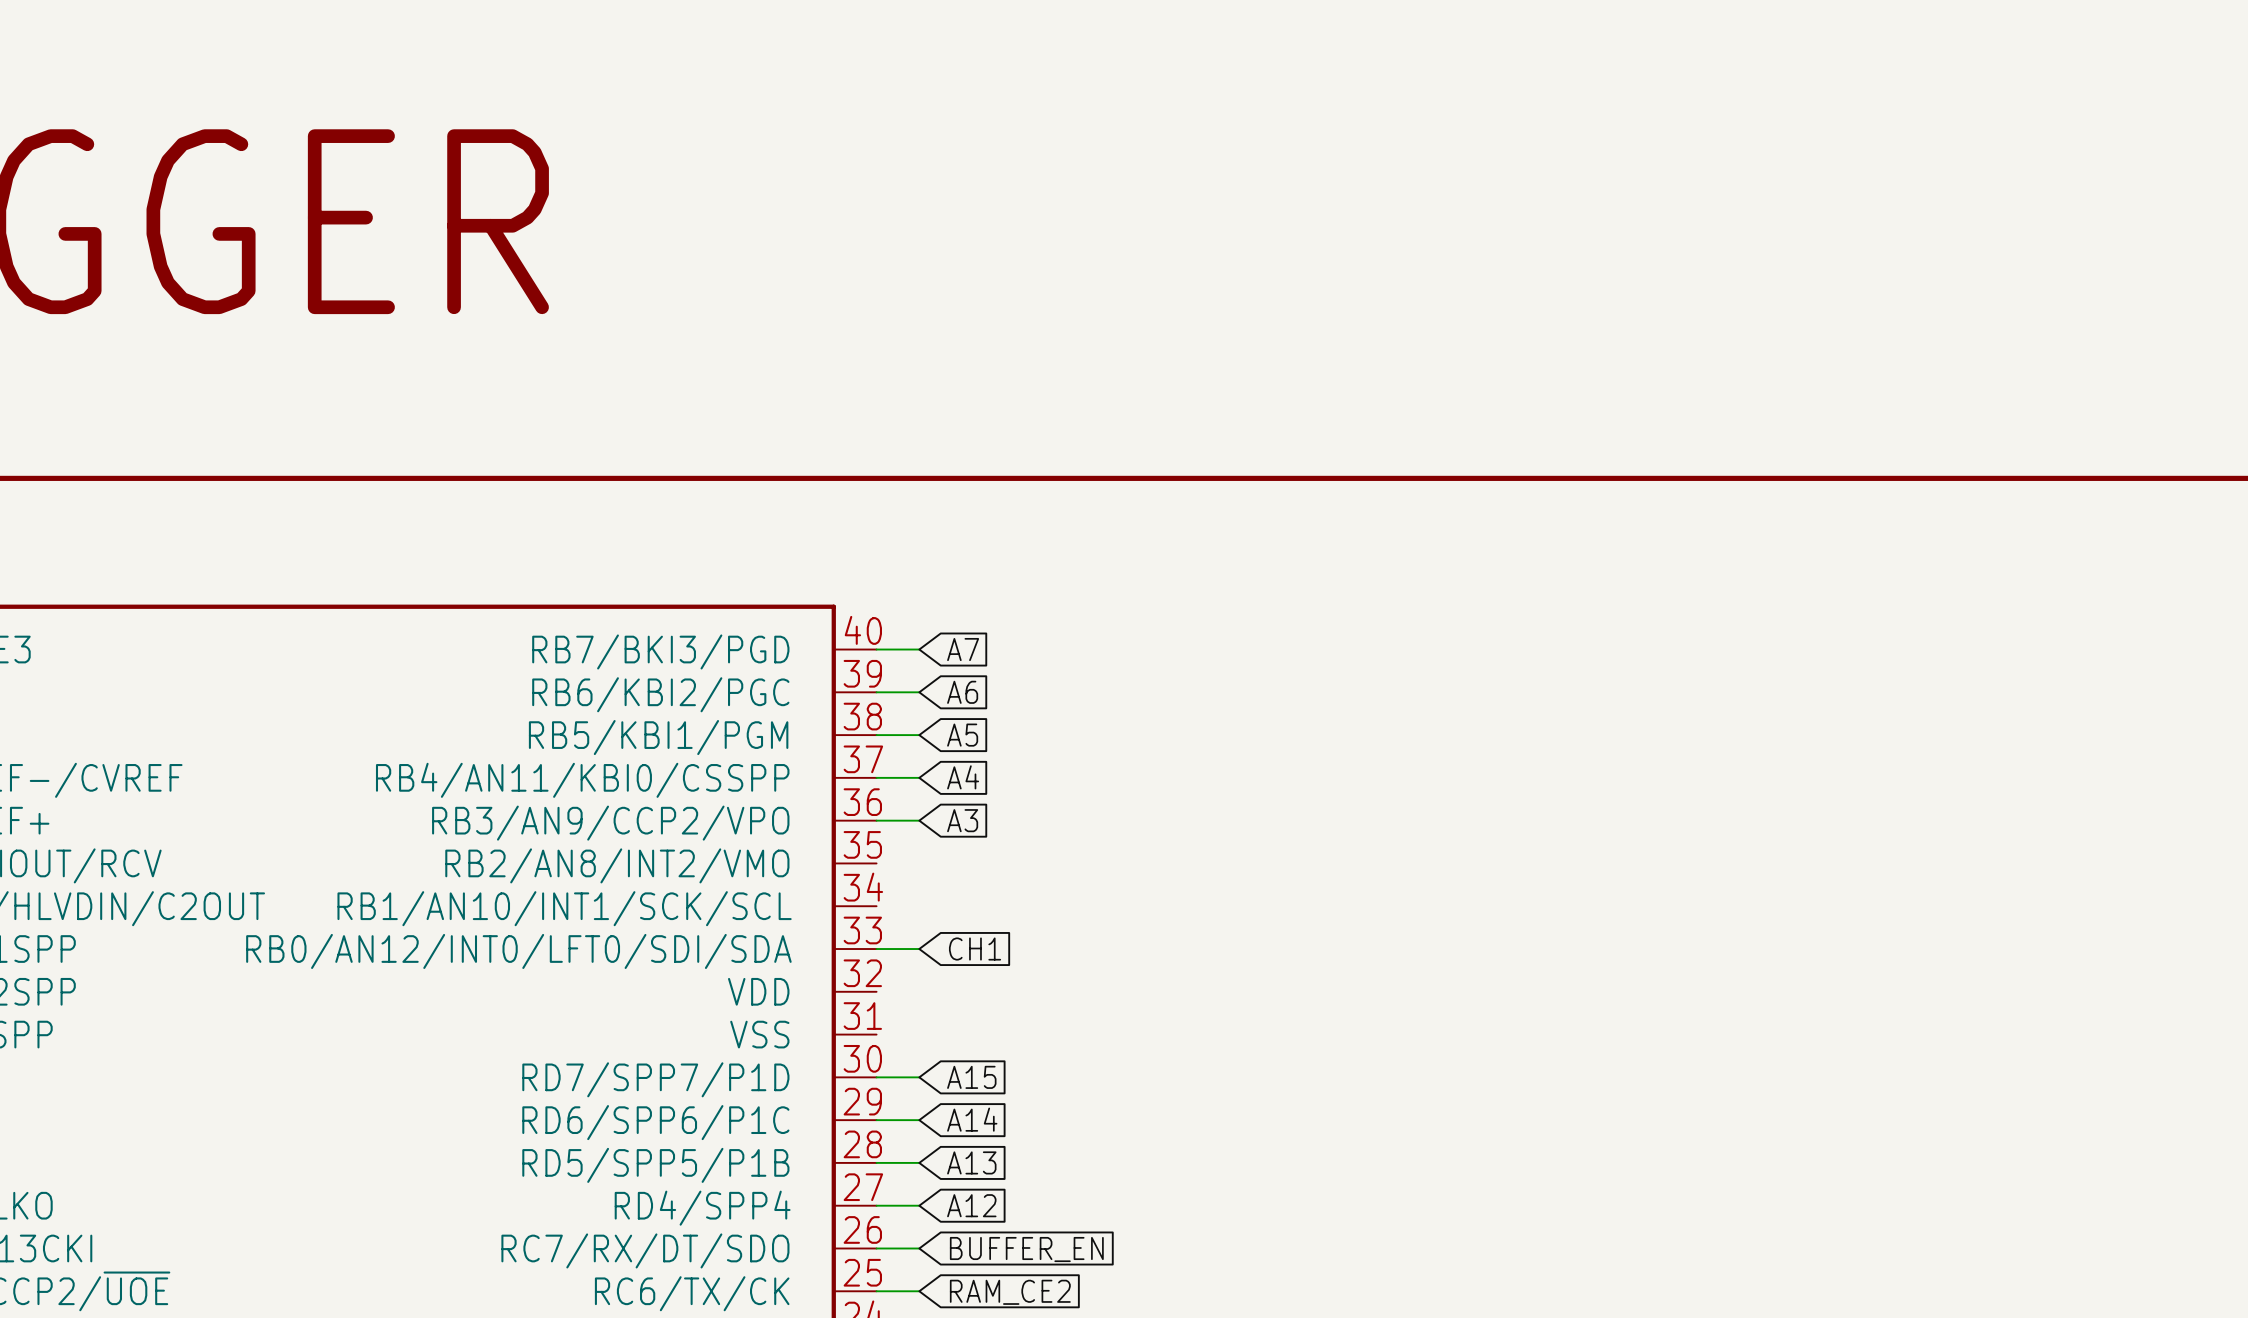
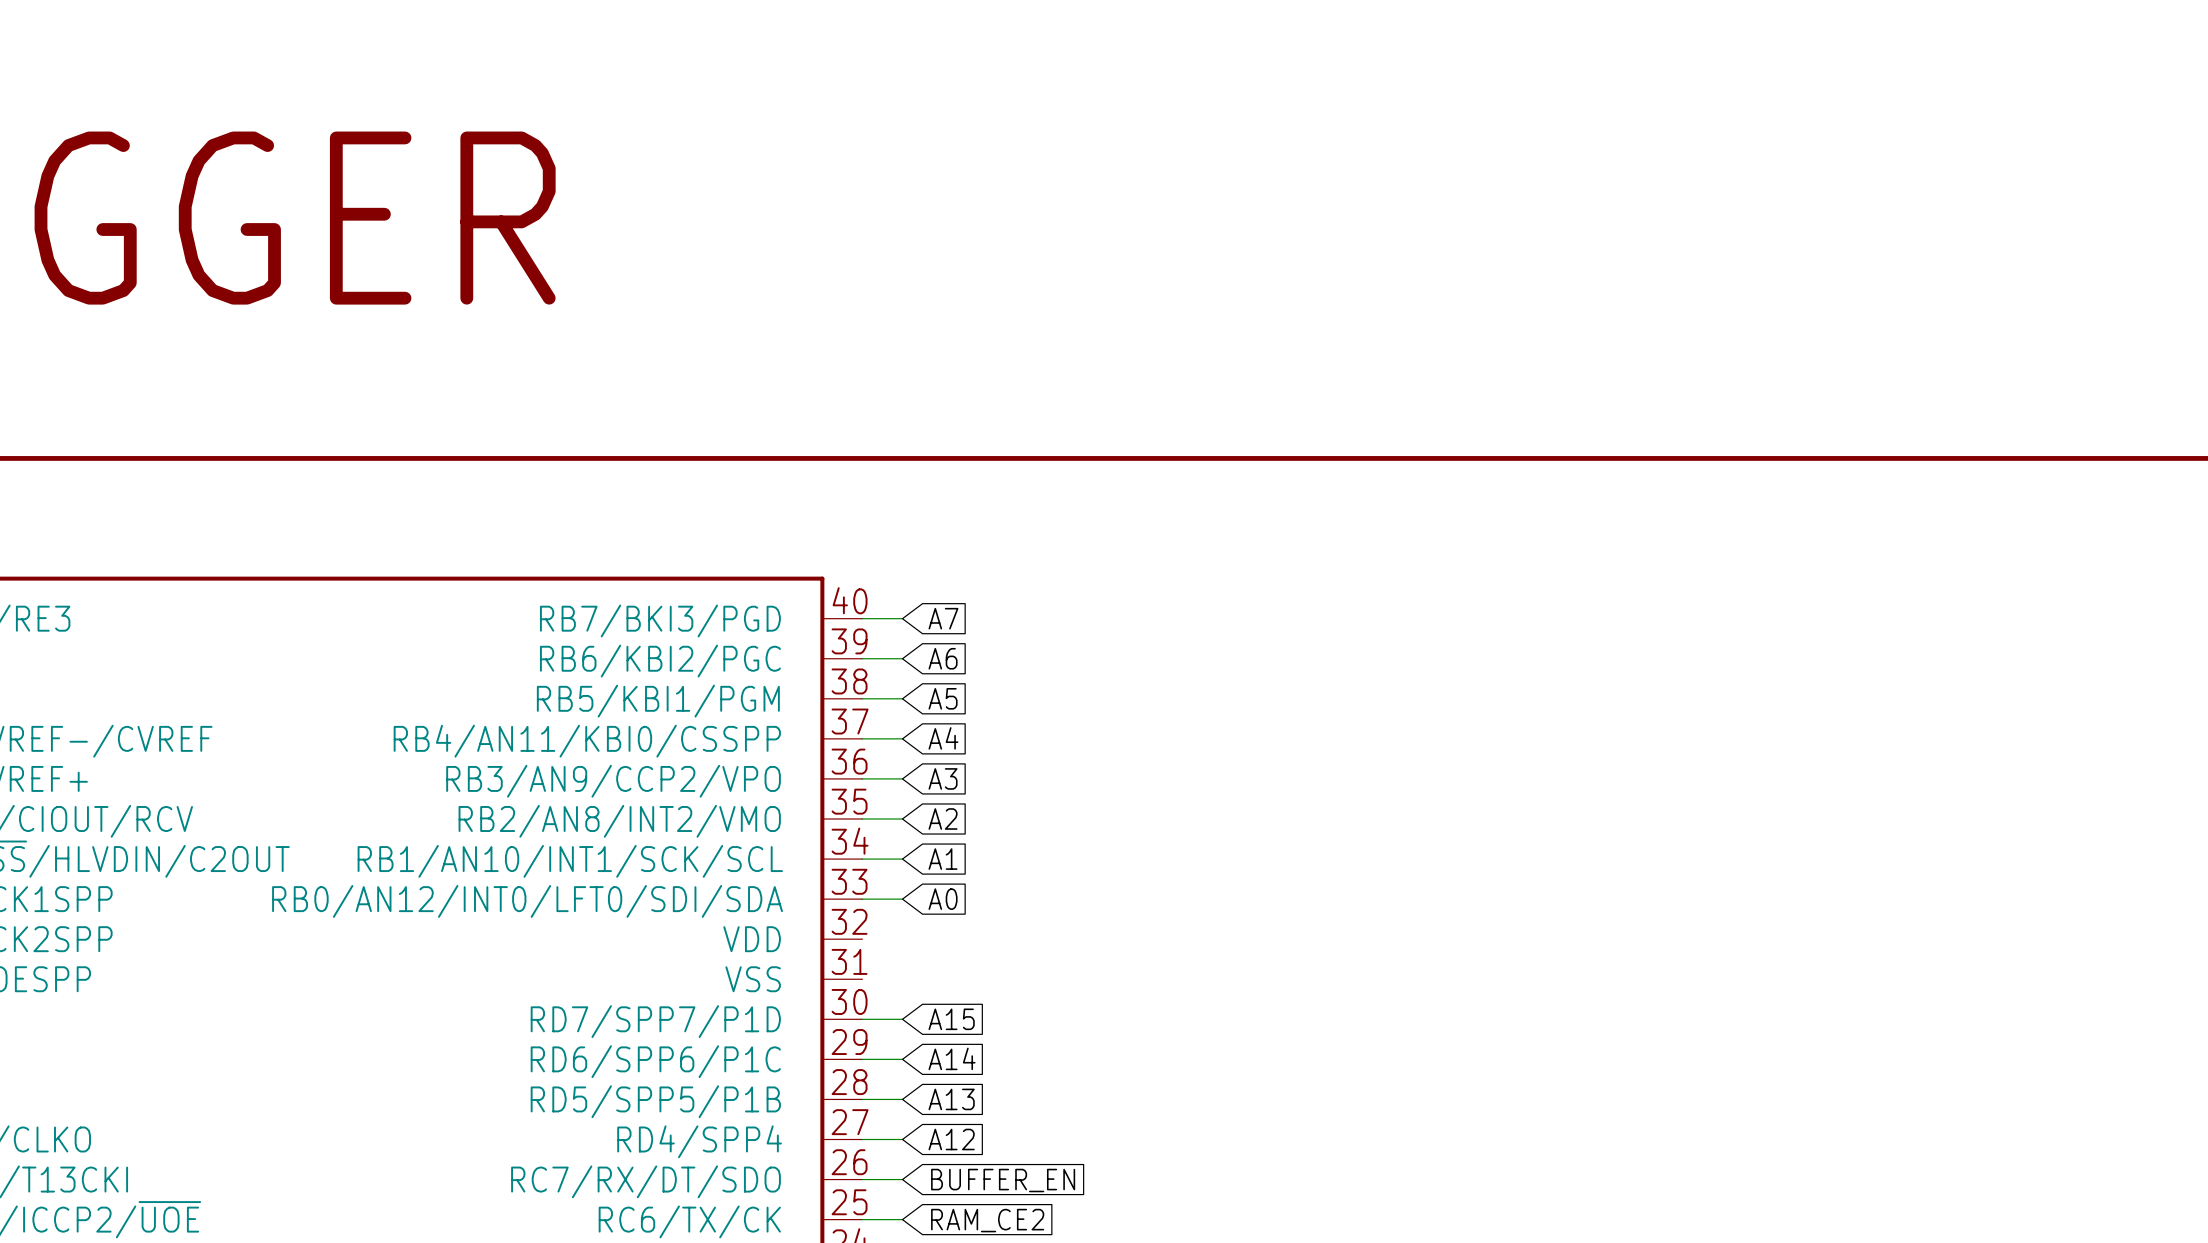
wire: none -> (862, 819) (902, 819)
global label: none -> A2 (943, 819)
wire: none -> (862, 859) (902, 859)
global label: none -> A1 (943, 859)
global label: CH1 (975, 949) -> A0 (943, 899)

